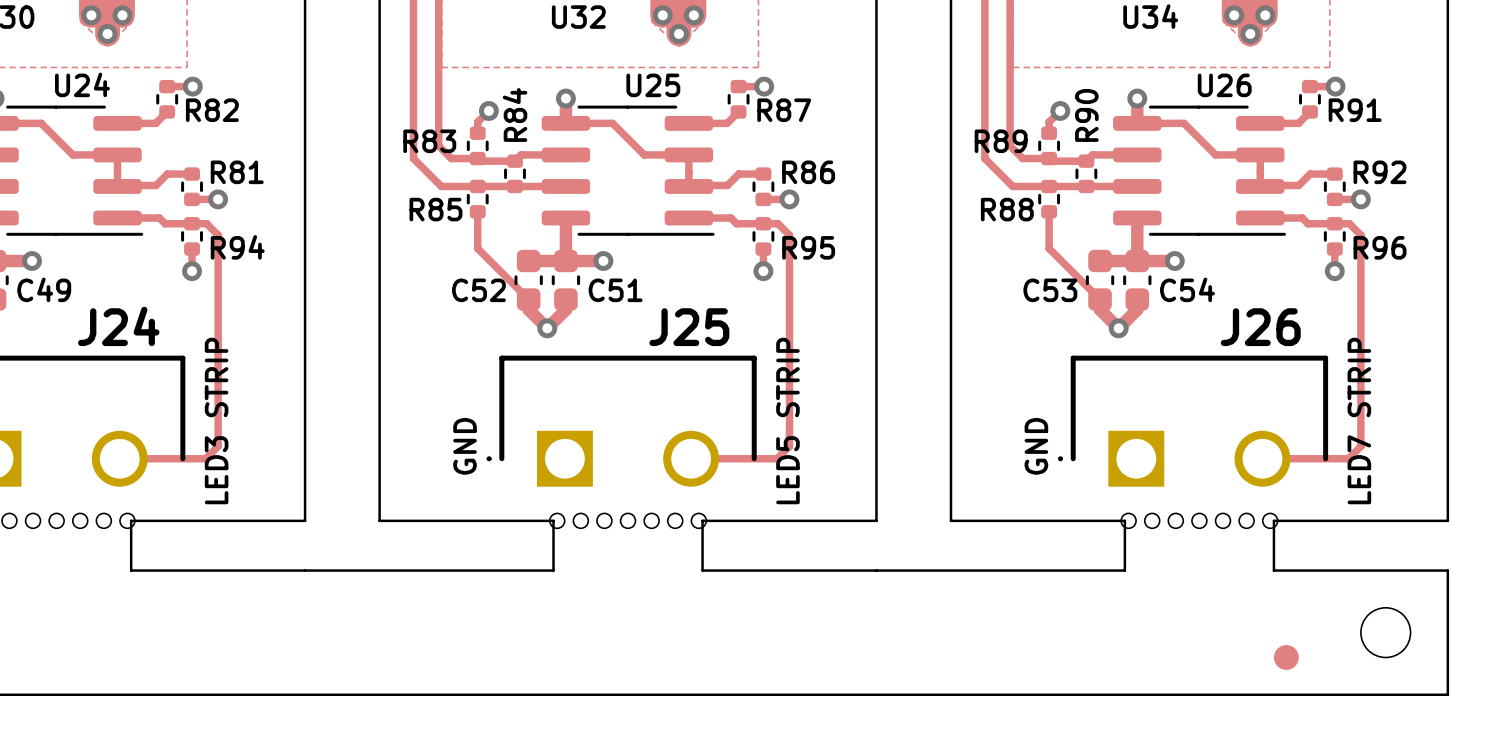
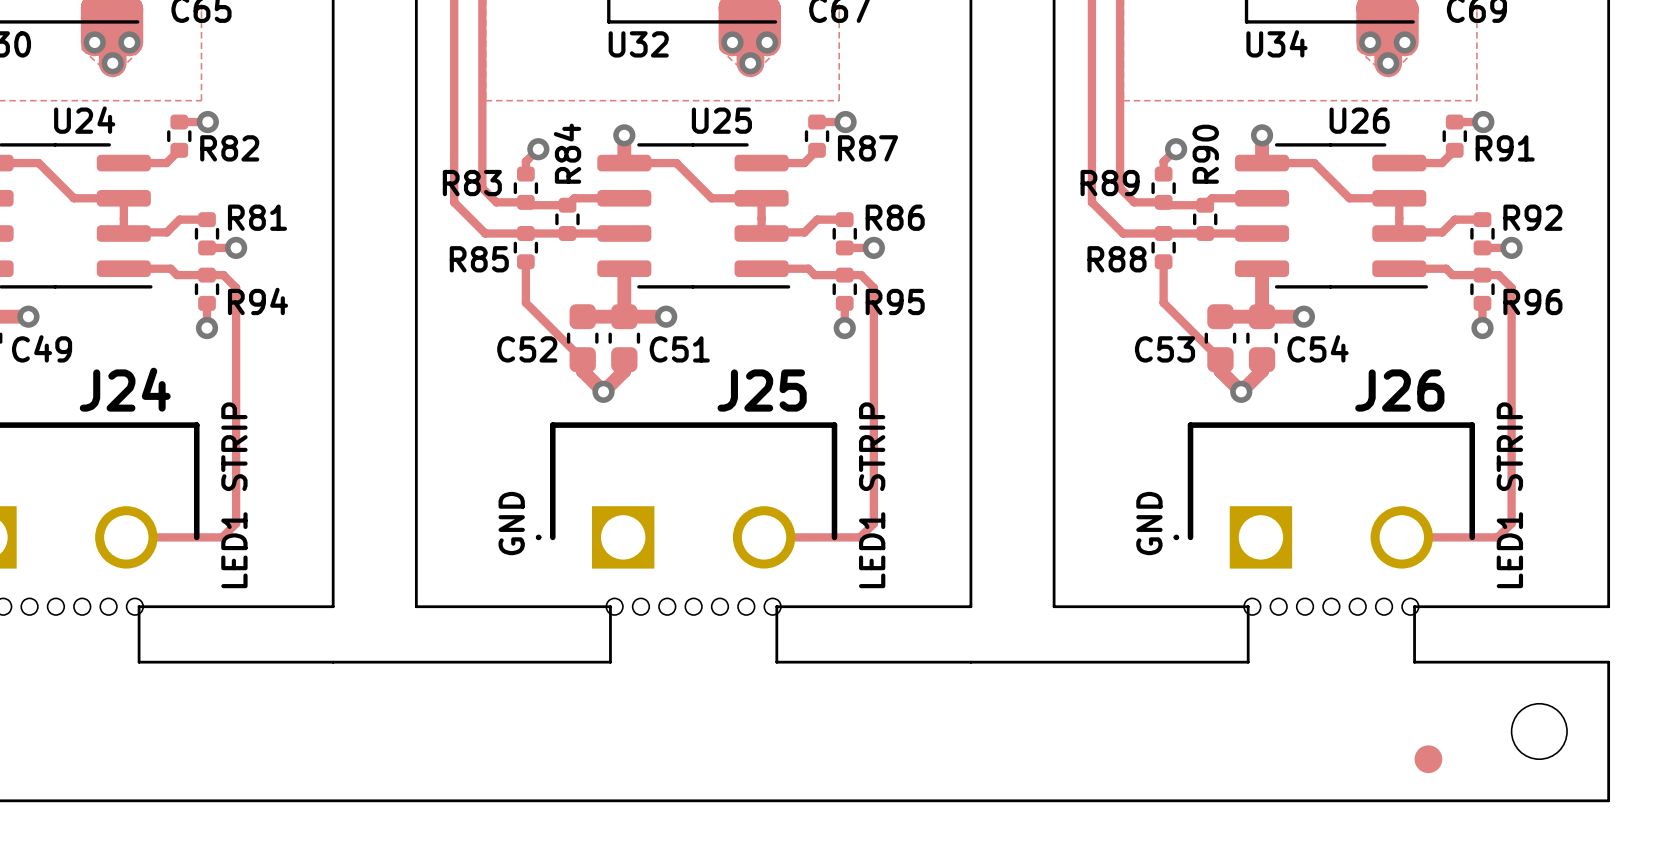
text: LED3 STRIP (216, 421) -> LED1 STRIP (234, 495)
text: LED5 STRIP (787, 421) -> LED1 STRIP (872, 495)
text: LED7 STRIP (1359, 421) -> LED1 STRIP (1509, 495)

